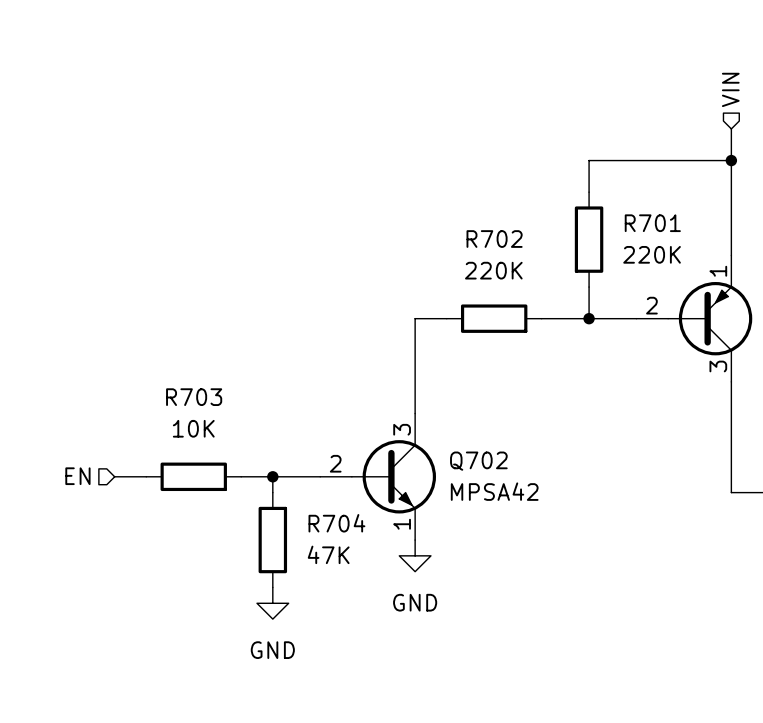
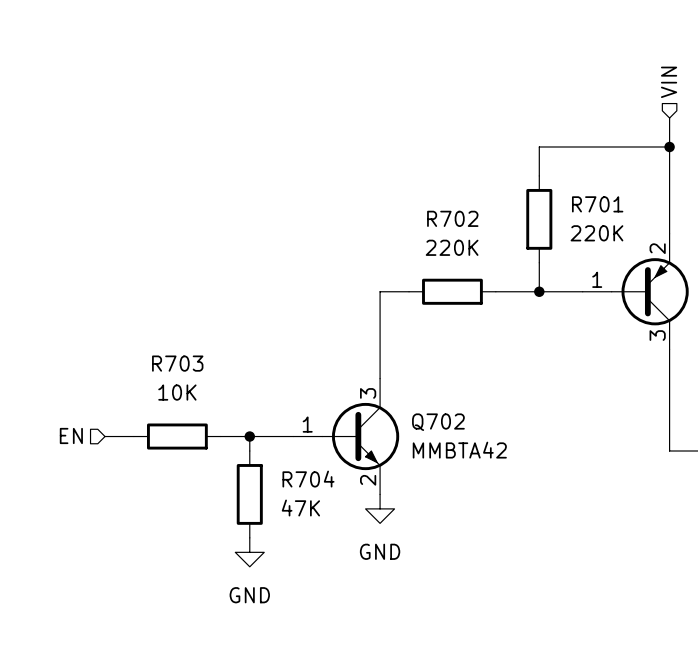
part pin number: 1 (718, 271) -> 2 (657, 248)
part pin number: 2 (651, 305) -> 1 (597, 279)
Q702 pin number: 2 (335, 463) -> 1 (307, 424)
Q702 value: MPSA42 (494, 491) -> MMBTA42 (459, 450)
Q702 pin number: 1 (402, 524) -> 2 (368, 480)

